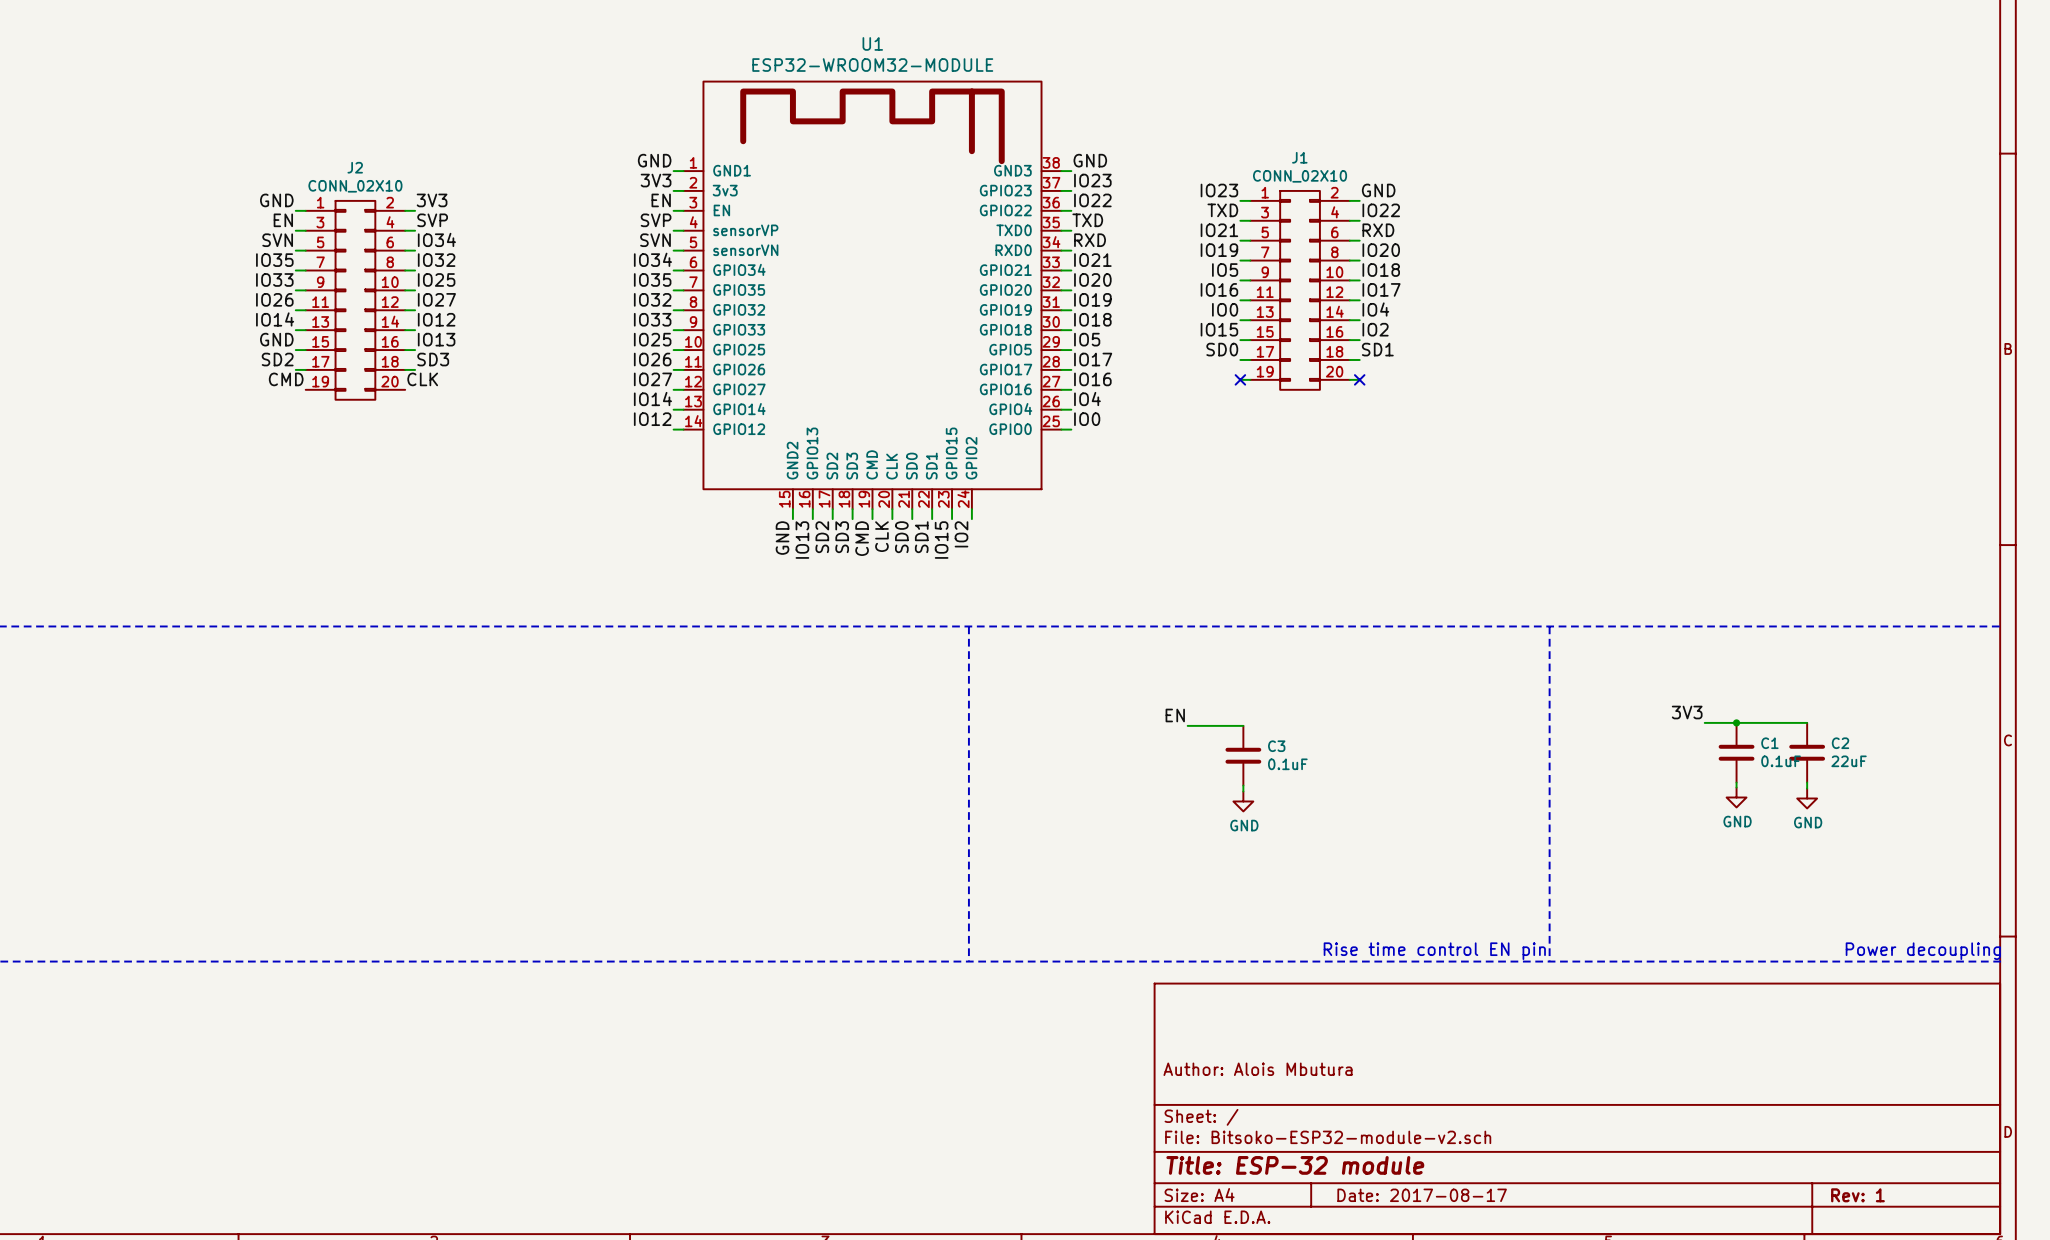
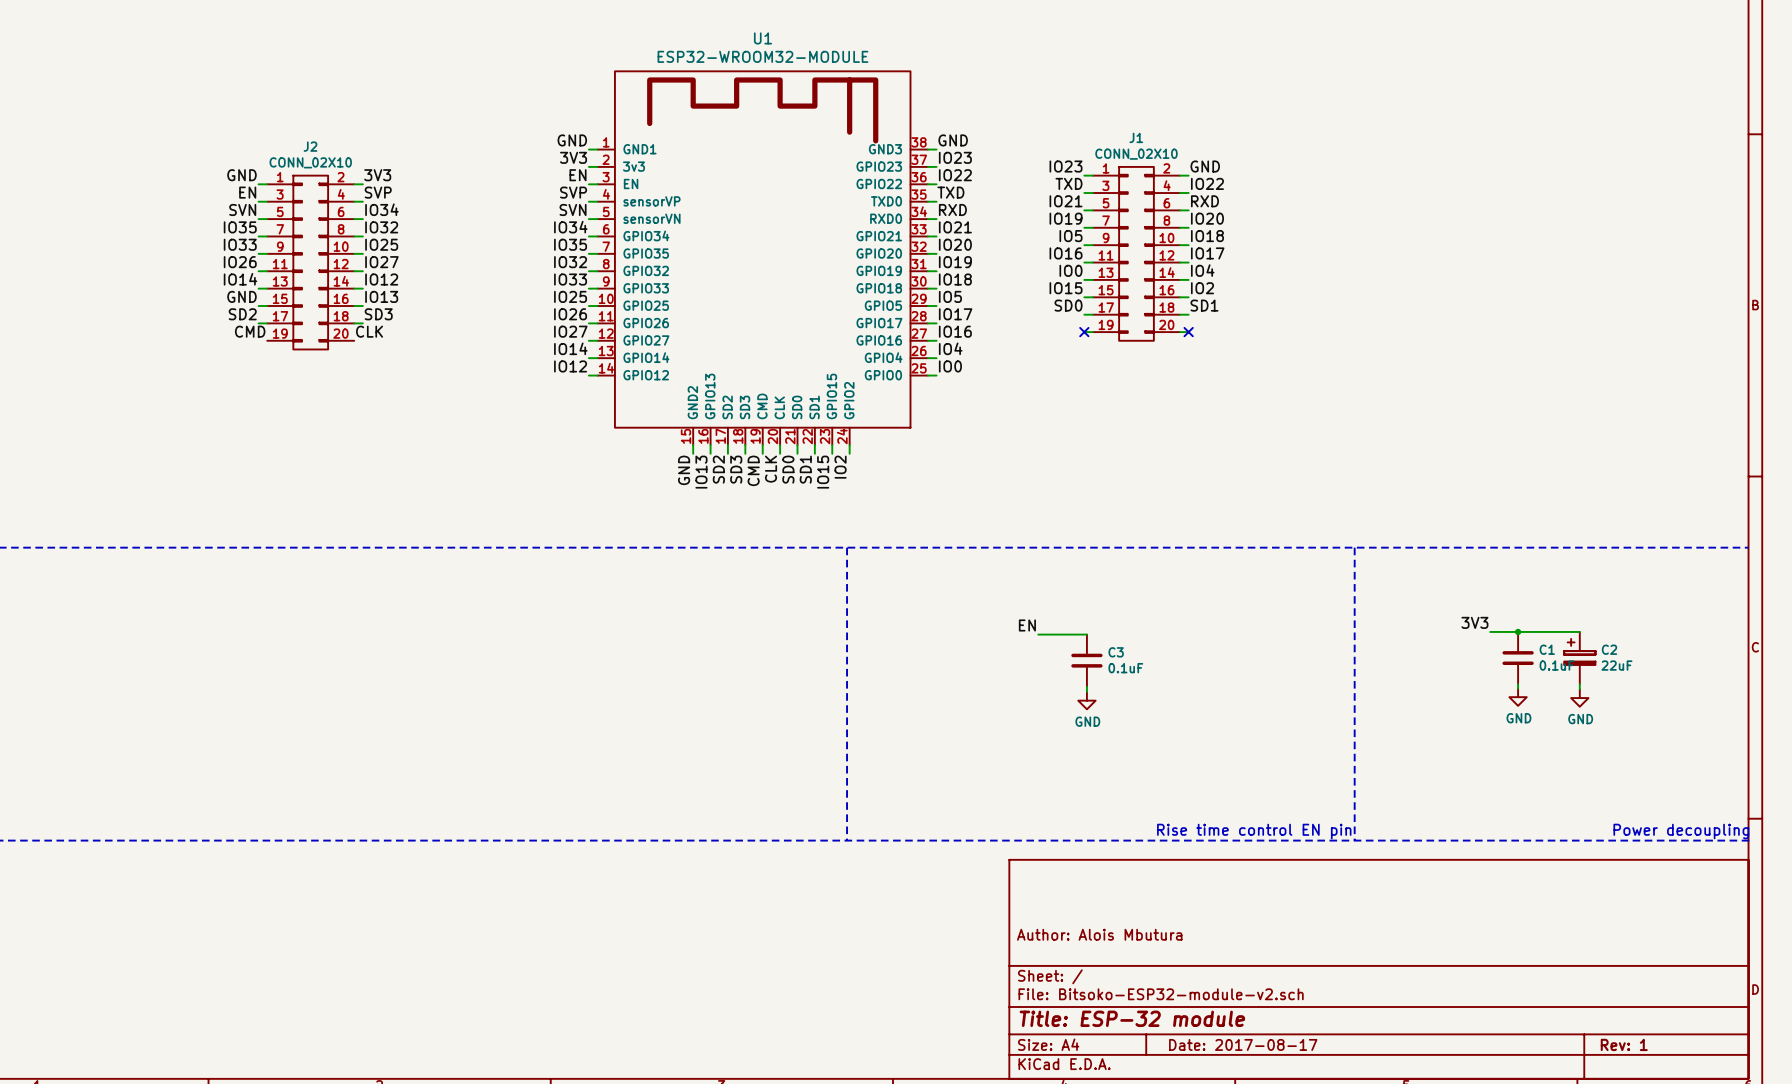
C2 symbol: [1789, 722, 1826, 783] -> [1564, 631, 1596, 685]

